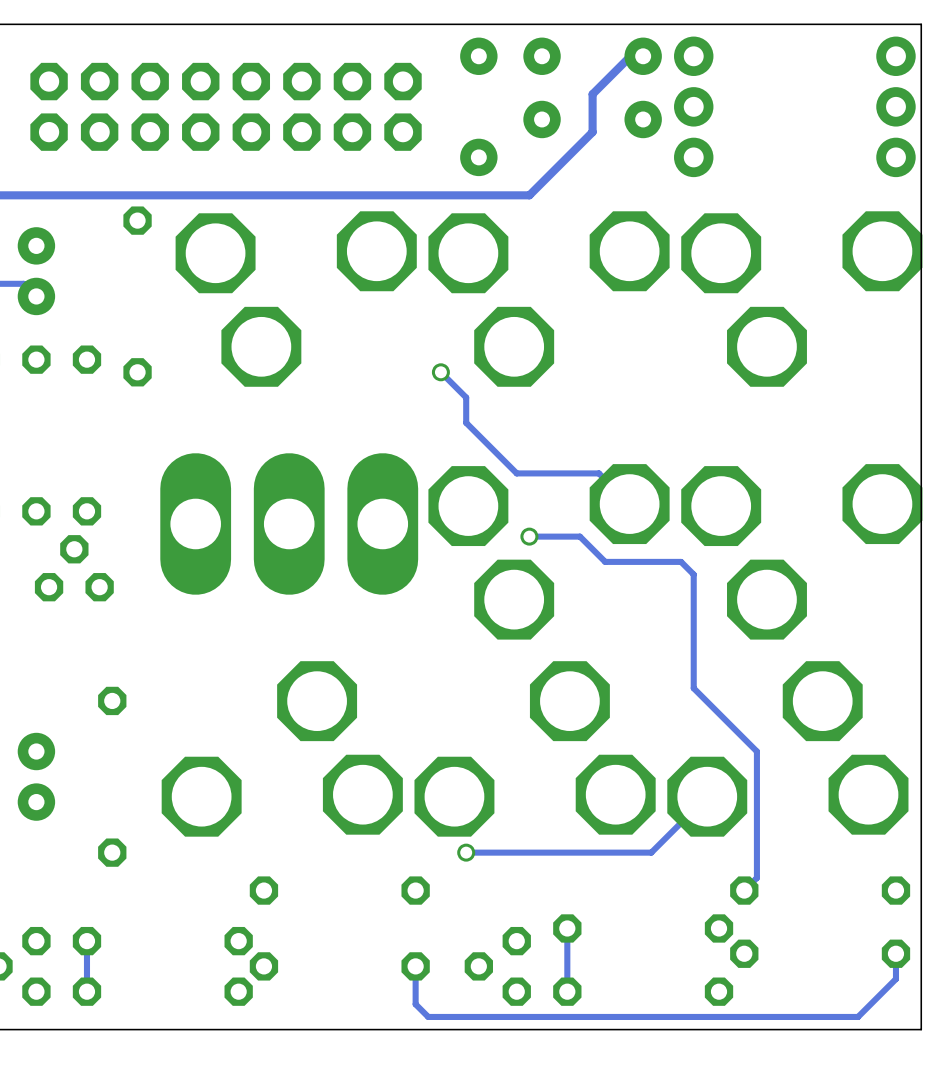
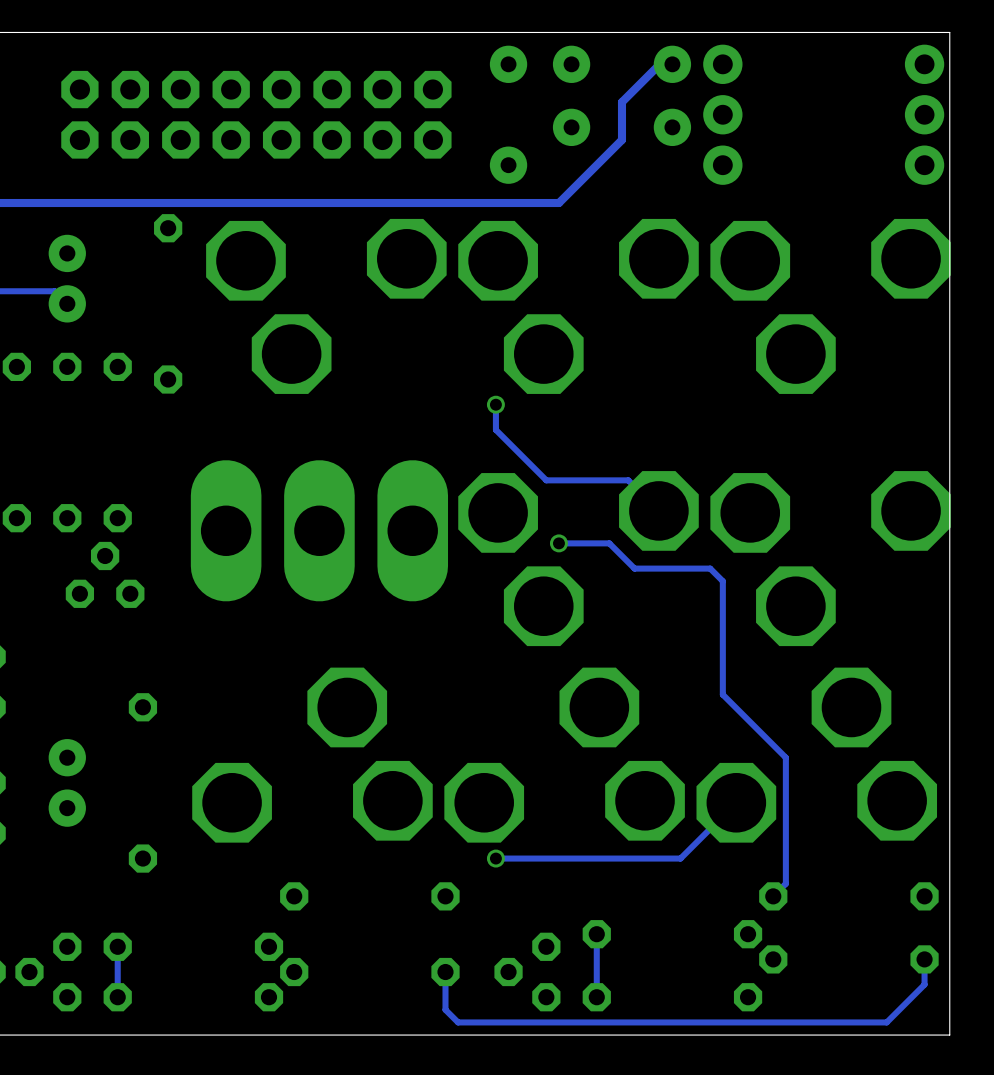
track: (440, 372) (466, 397) -> none
via position: (440, 372) -> (495, 404)

